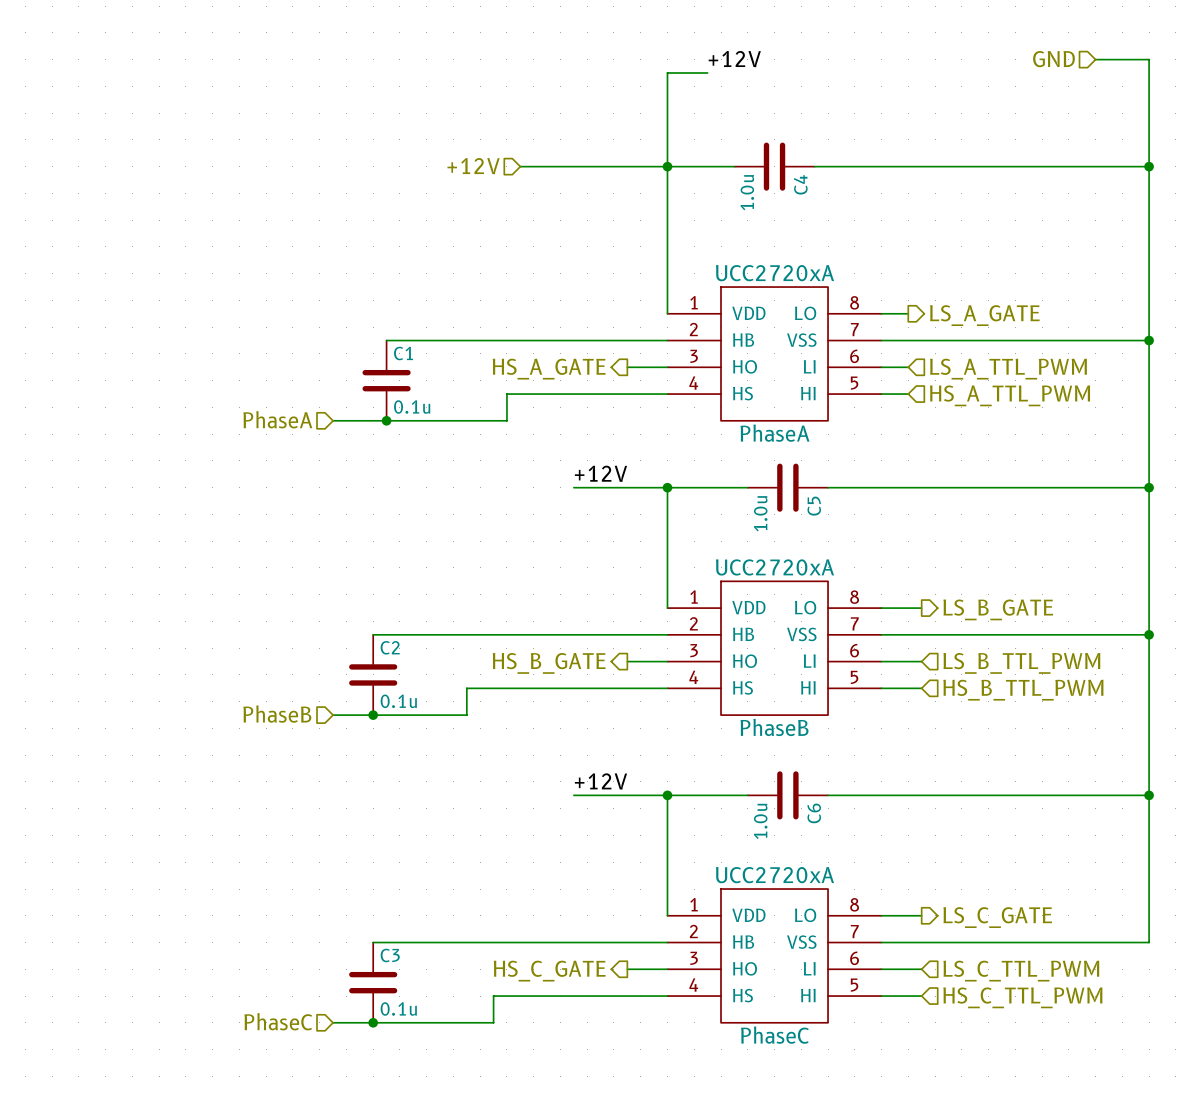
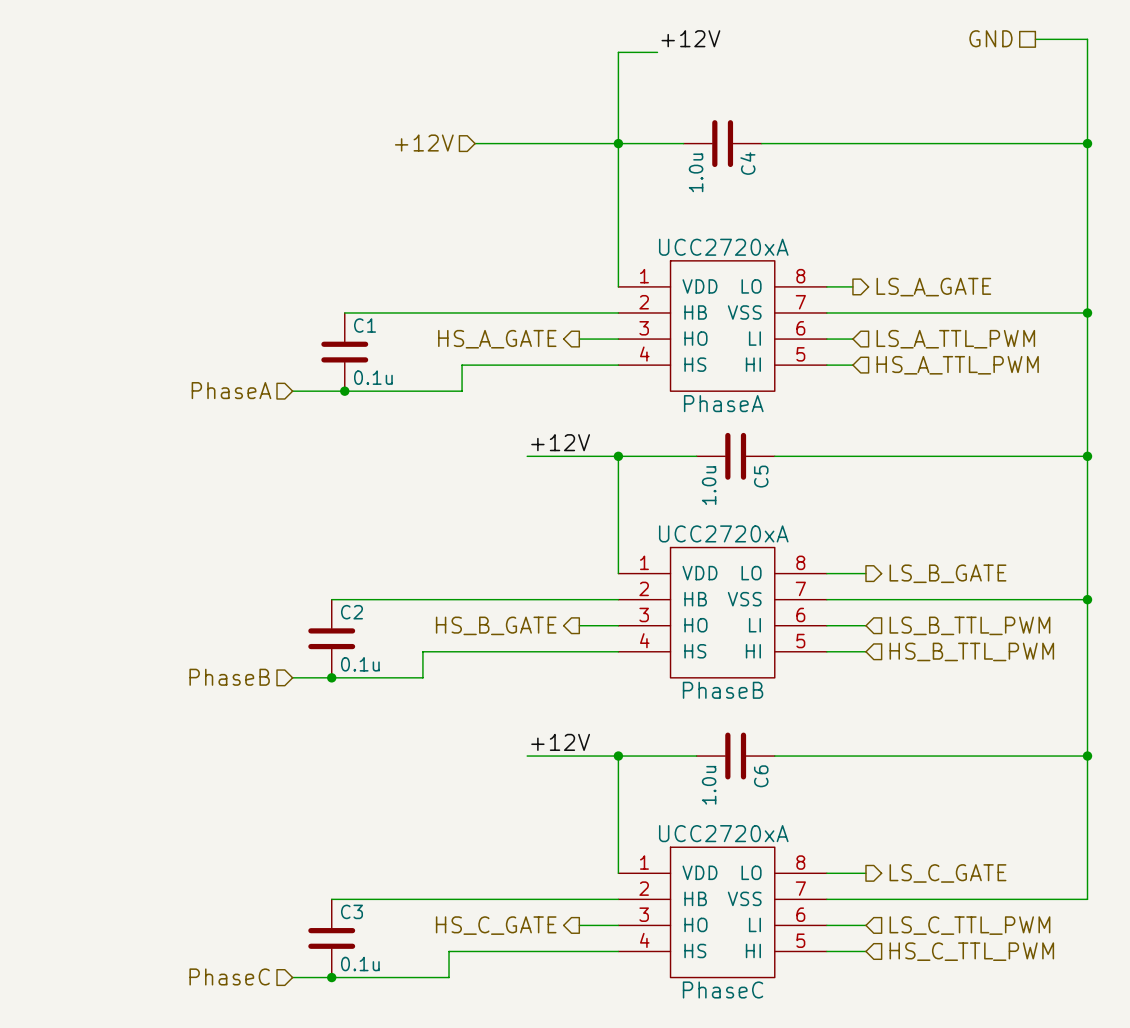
hierarchical label shape: input (1054, 59) -> passive (990, 38)

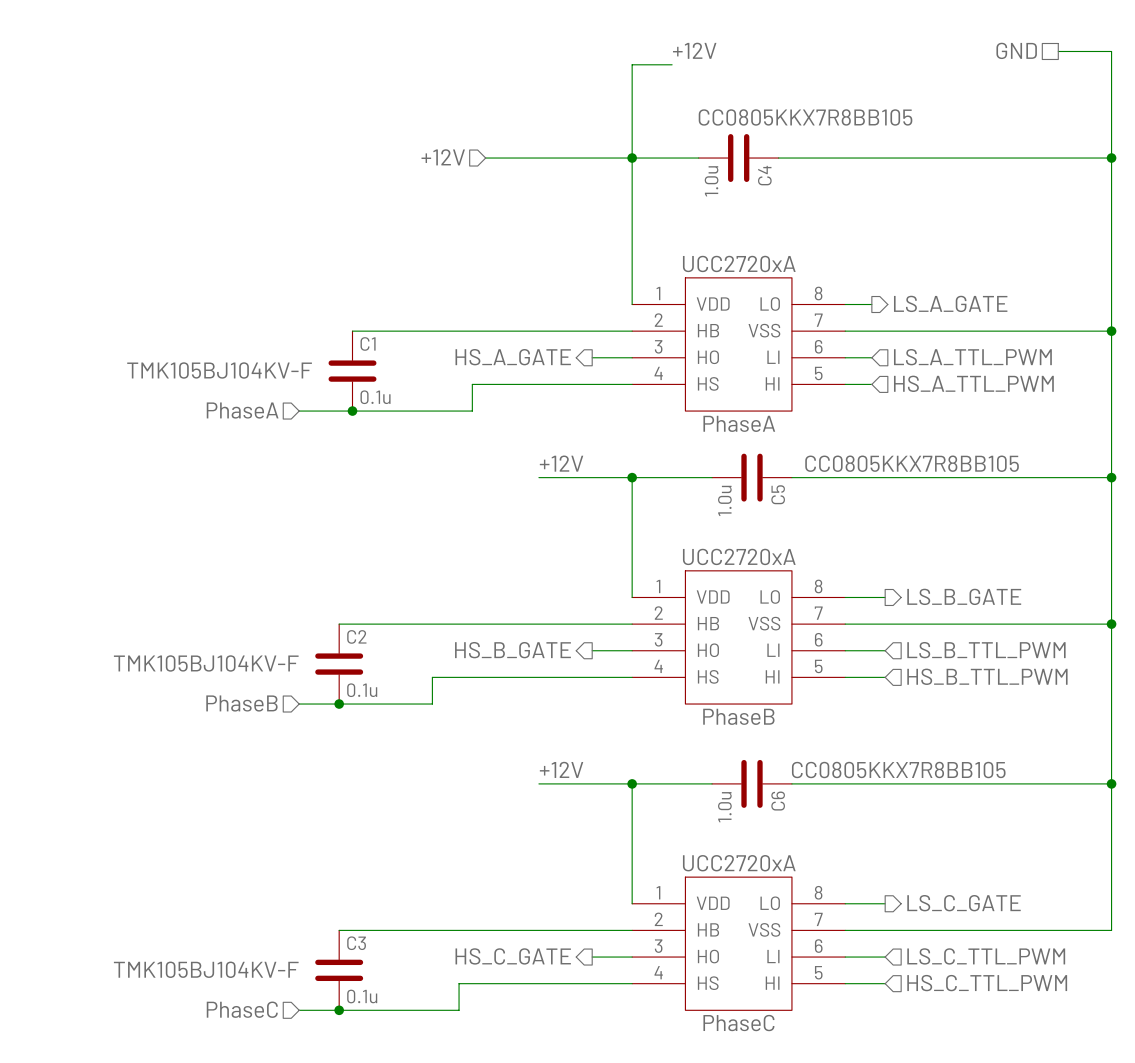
C4 text: none -> CC0805KKX7R8BB105 (805, 117)
C1 text: none -> TMK105BJ104KV-F (219, 370)
C5 text: none -> CC0805KKX7R8BB105 (912, 463)
C2 text: none -> TMK105BJ104KV-F (206, 663)
C6 text: none -> CC0805KKX7R8BB105 (898, 770)
C3 text: none -> TMK105BJ104KV-F (206, 969)

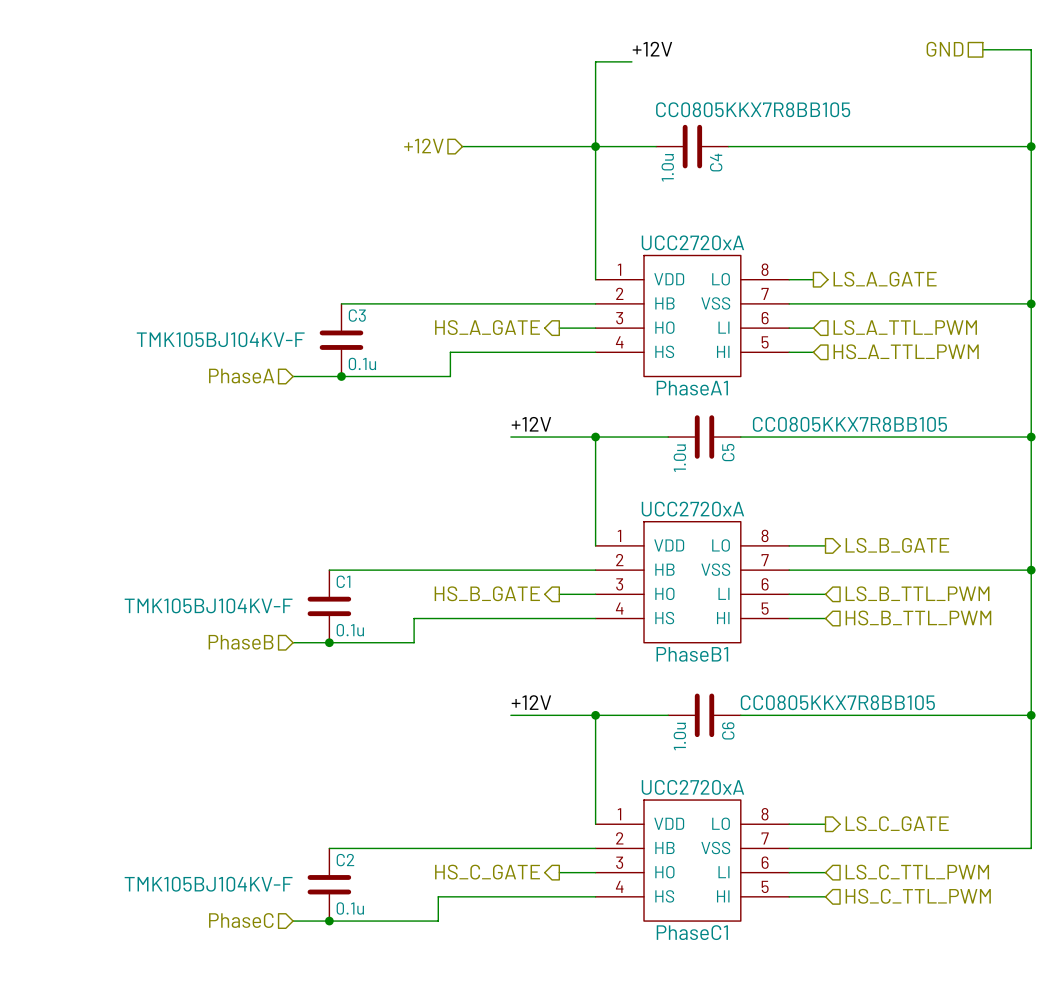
C1 name: C1 (368, 343) -> C3 (357, 315)
PhaseA name: PhaseA (739, 423) -> PhaseA1 (692, 388)
C2 name: C2 (356, 636) -> C1 (343, 581)
PhaseB name: PhaseB (738, 716) -> PhaseB1 (692, 654)
C3 name: C3 (356, 943) -> C2 (345, 860)
PhaseC name: PhaseC (738, 1023) -> PhaseC1 (692, 932)

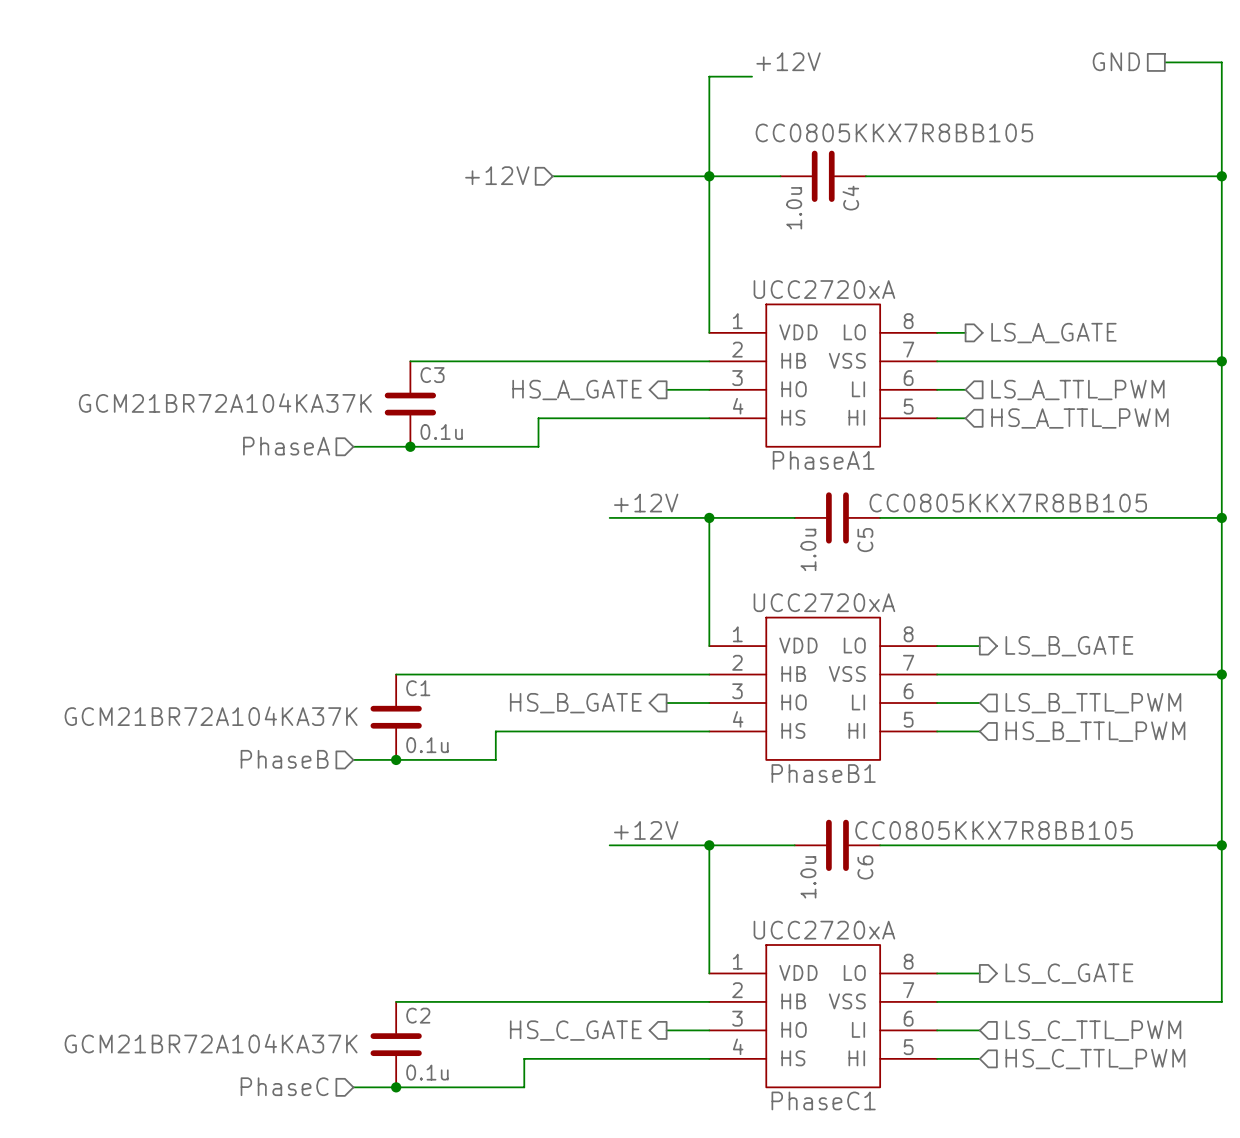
C3 text: TMK105BJ104KV-F (220, 339) -> GCM21BR72A104KA37K (225, 403)
C1 text: TMK105BJ104KV-F (208, 605) -> GCM21BR72A104KA37K (211, 716)
C2 text: TMK105BJ104KV-F (208, 884) -> GCM21BR72A104KA37K (211, 1043)

